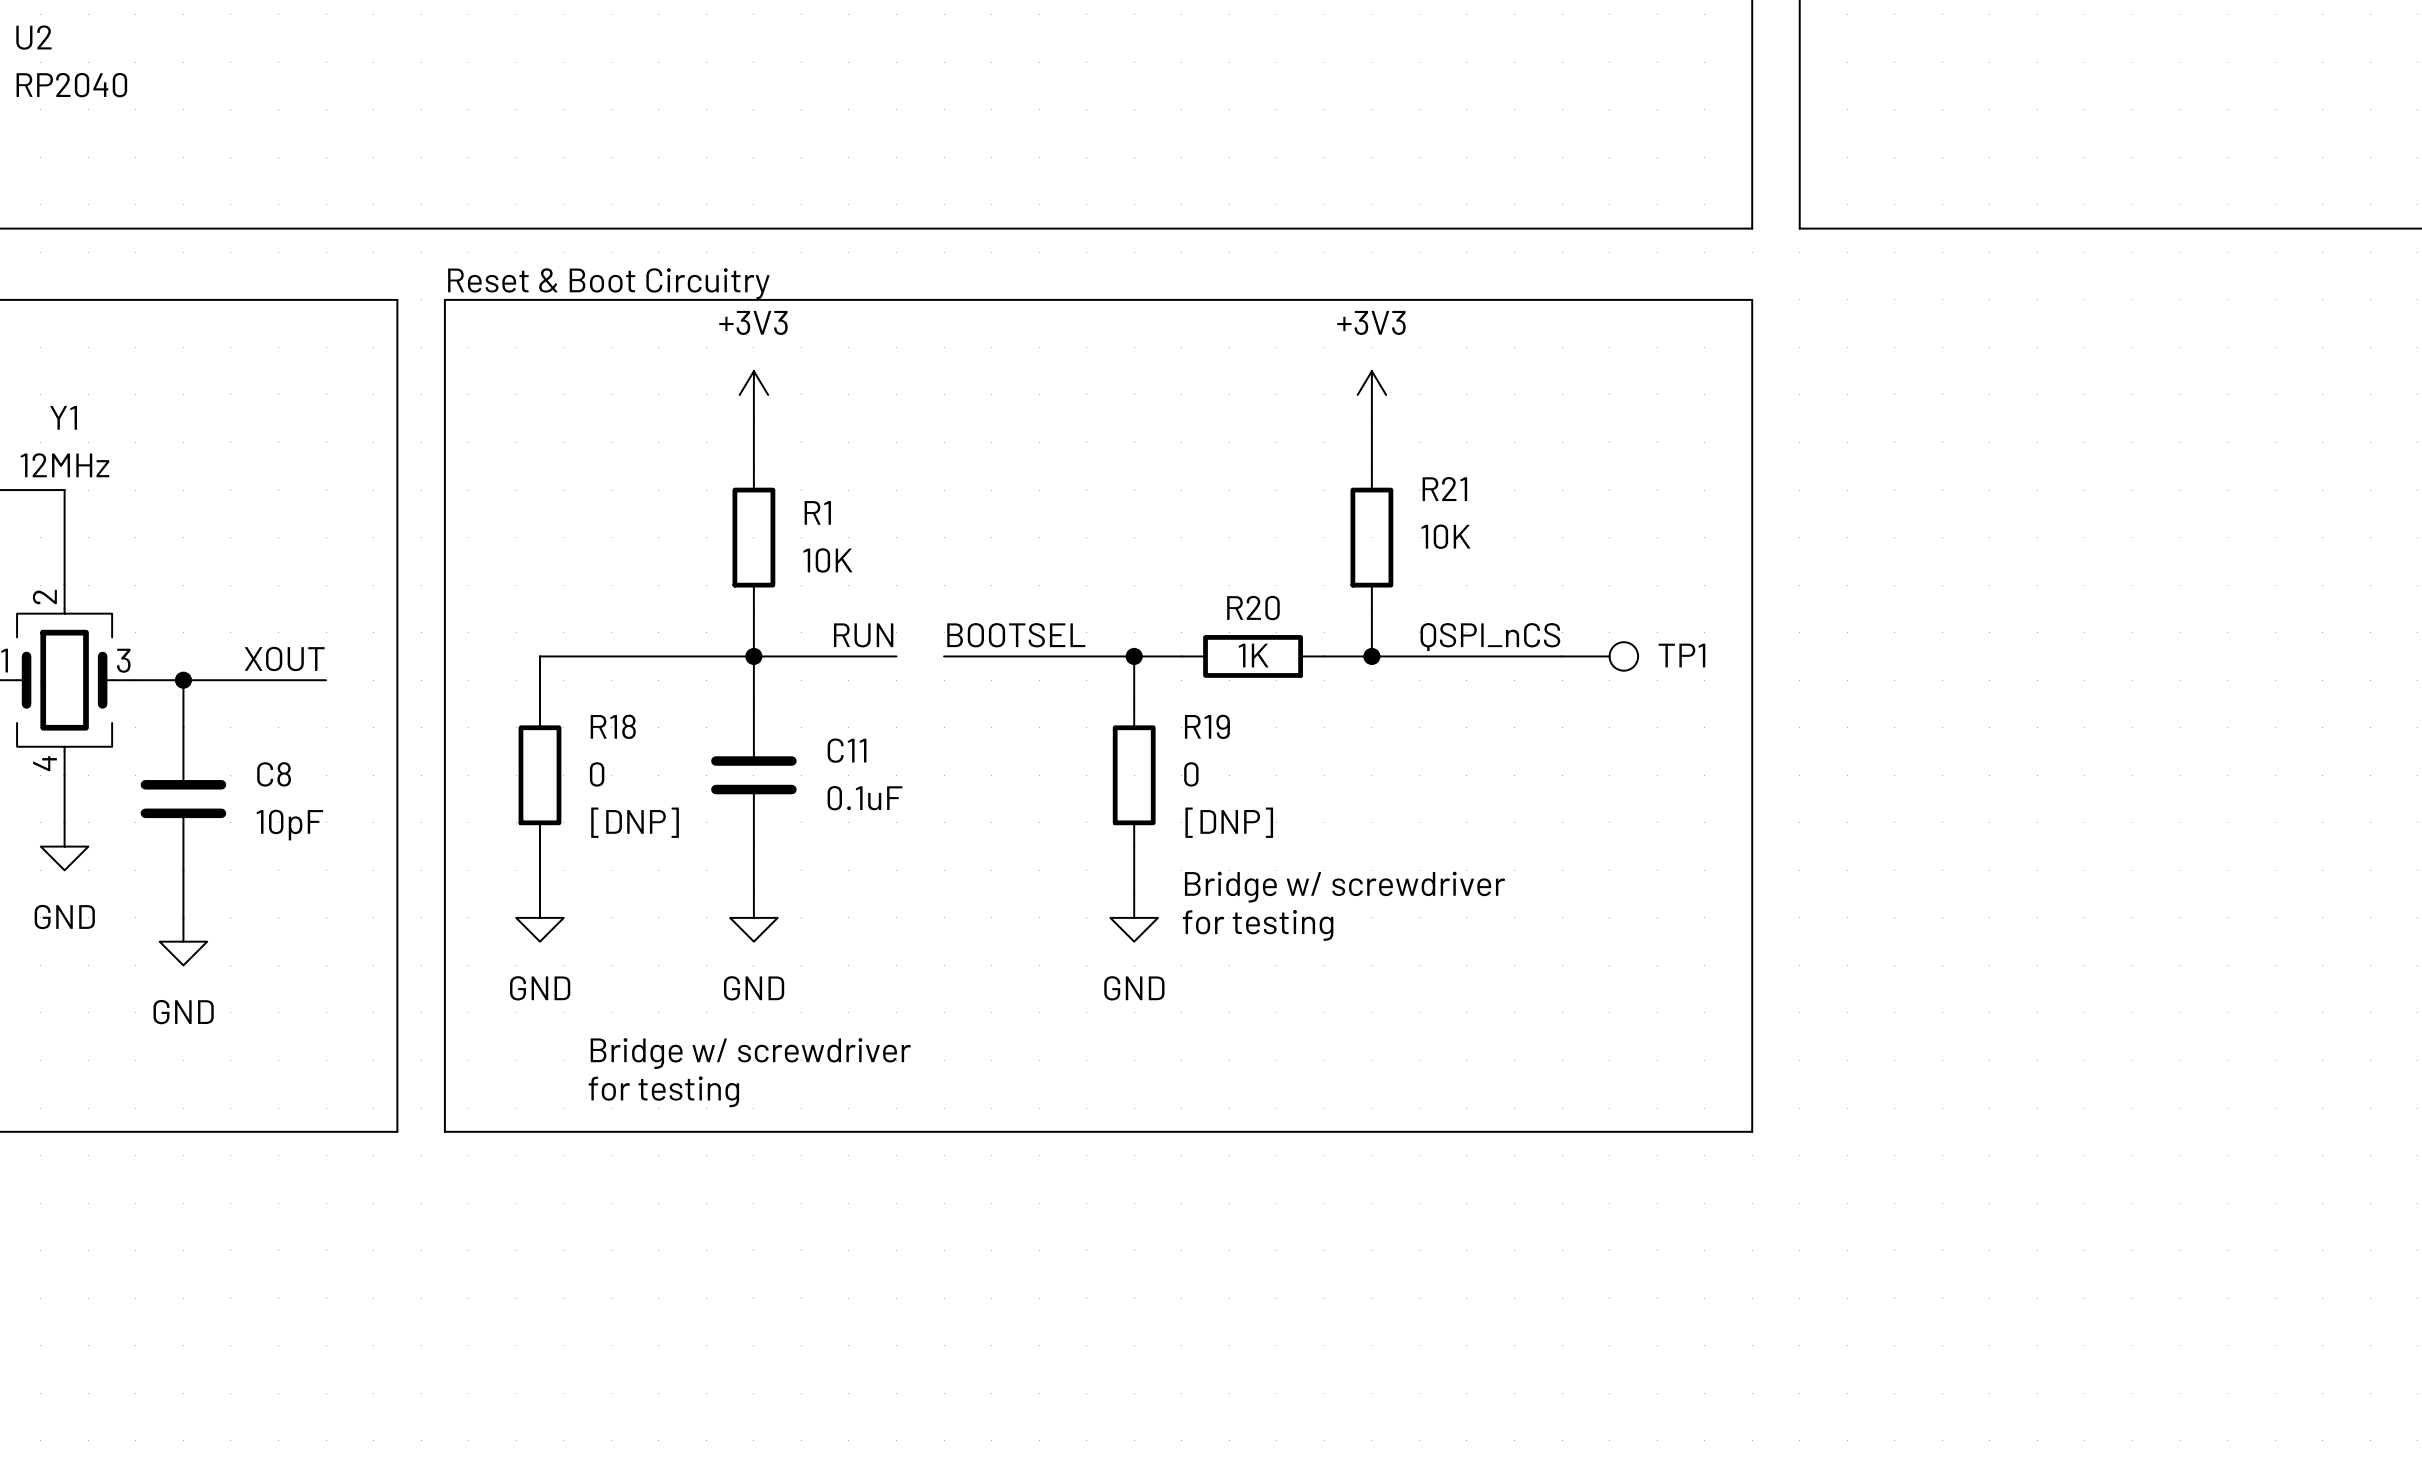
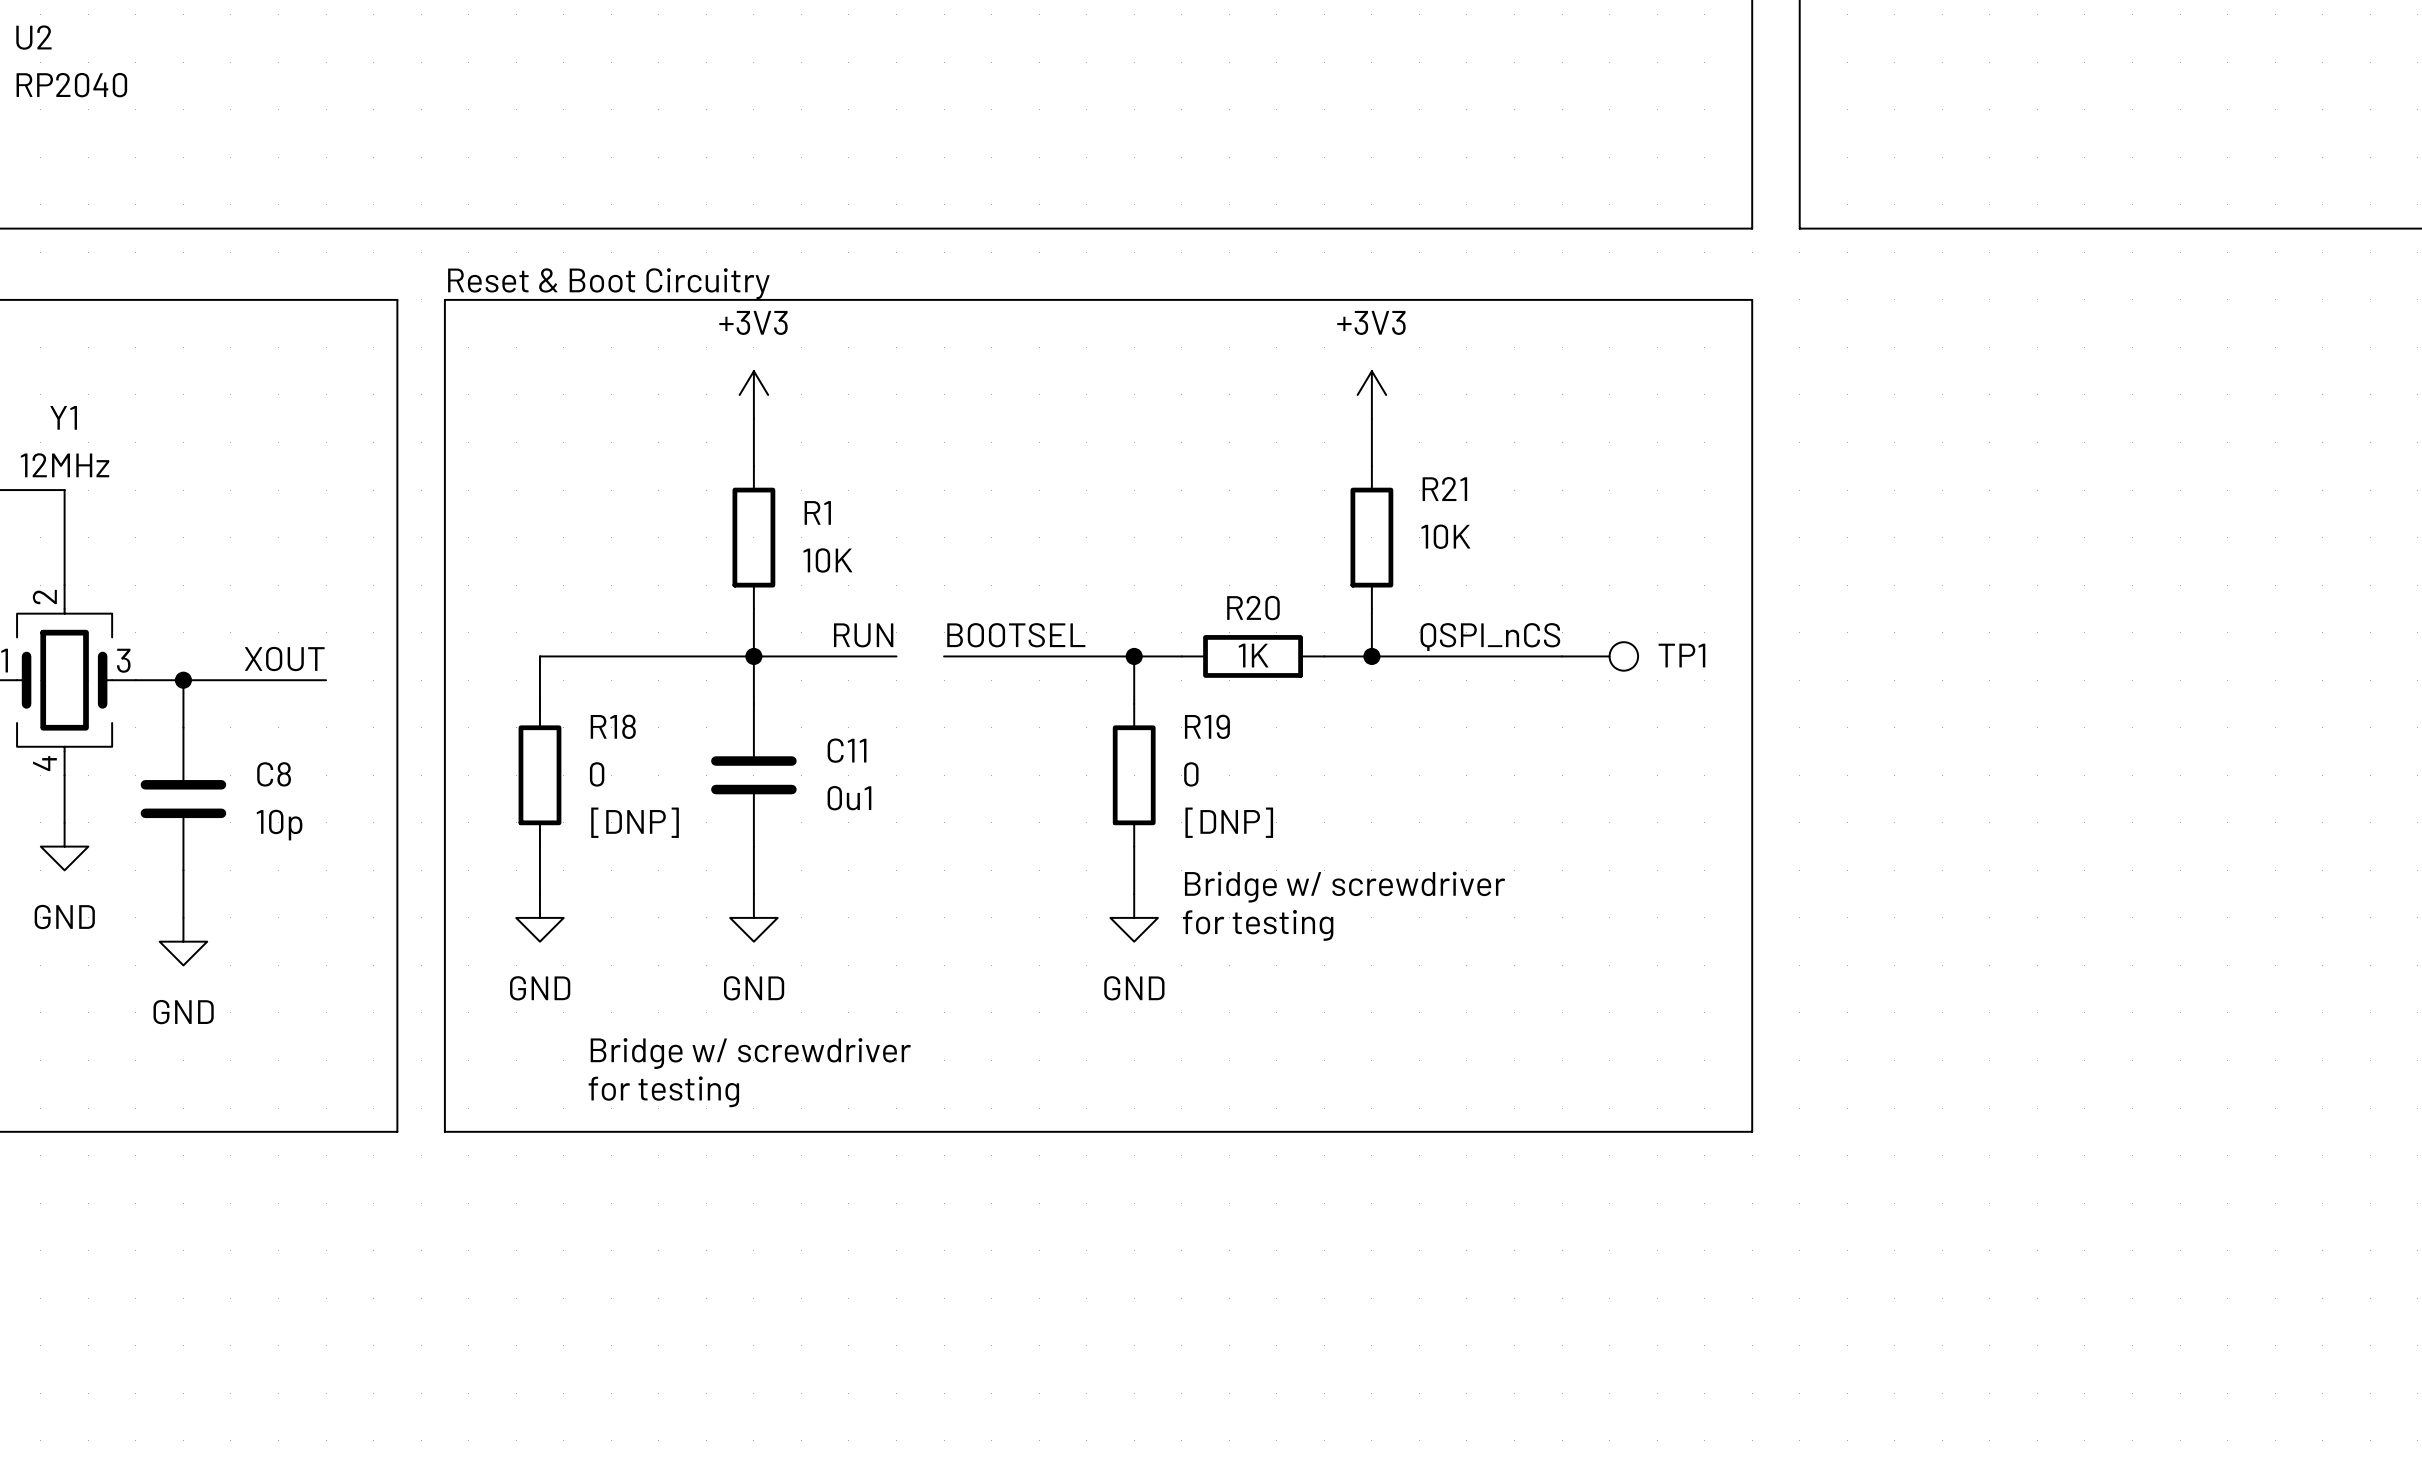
C11 value: 0.1uF (865, 798) -> 0u1 (849, 798)
C8 value: 10pF (289, 825) -> 10p (279, 825)

